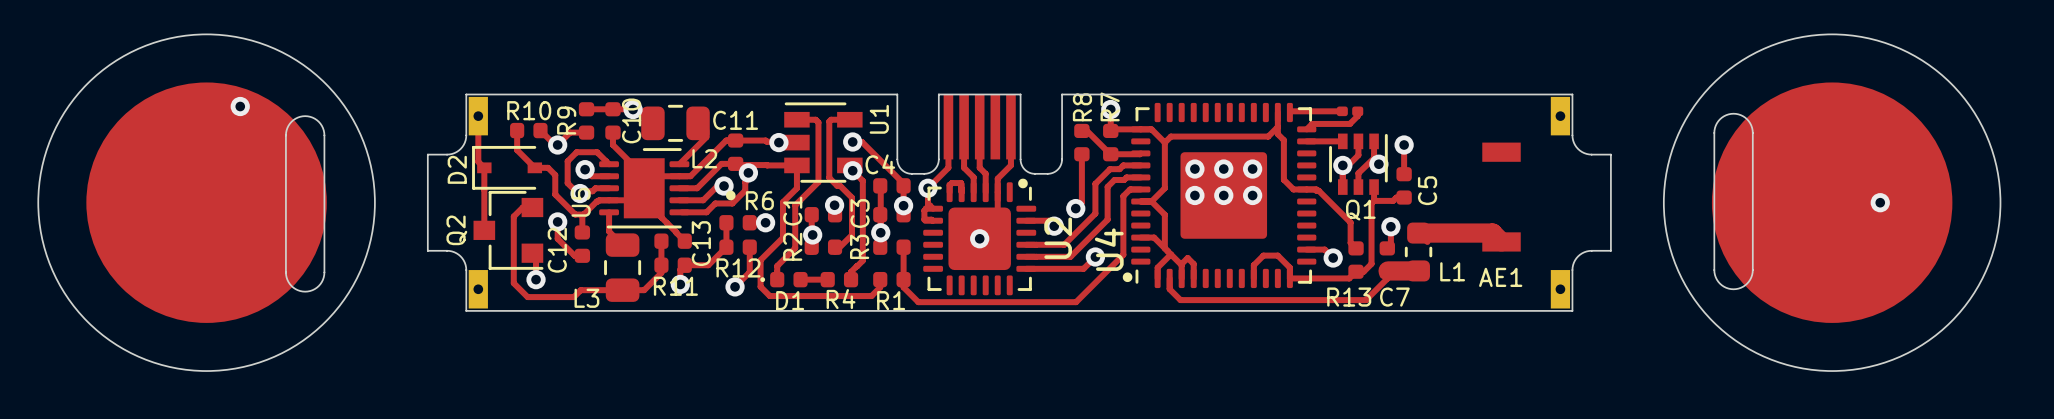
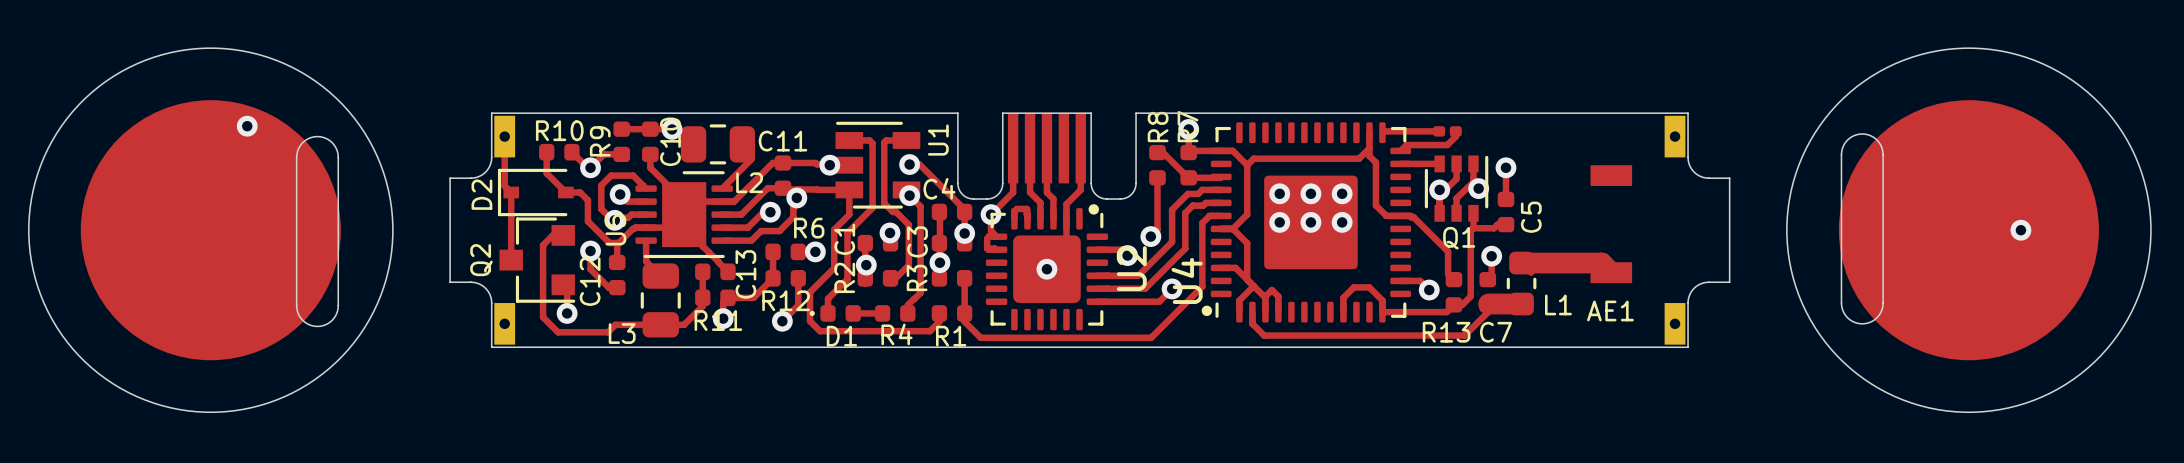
drawing: [726, 190, 736, 201] -> none

